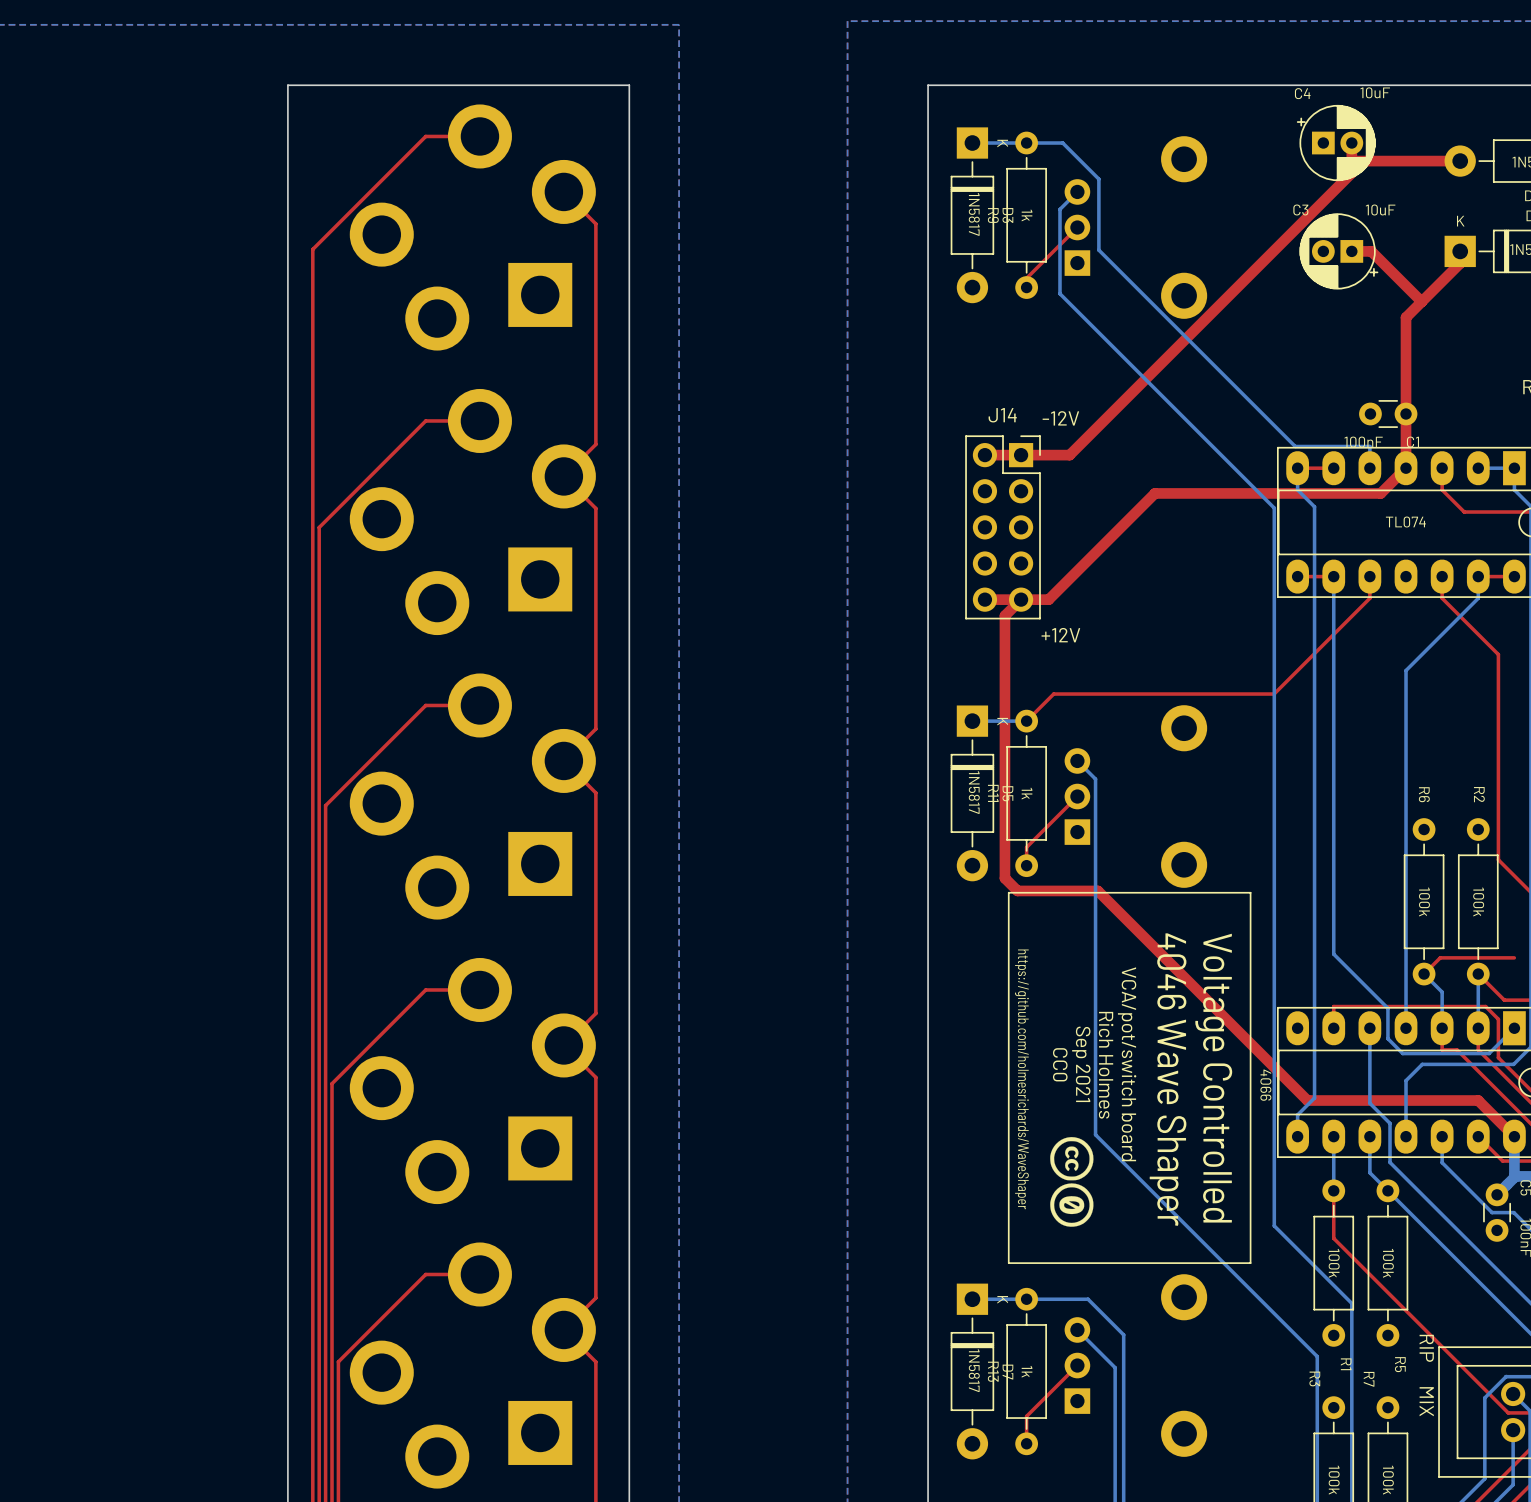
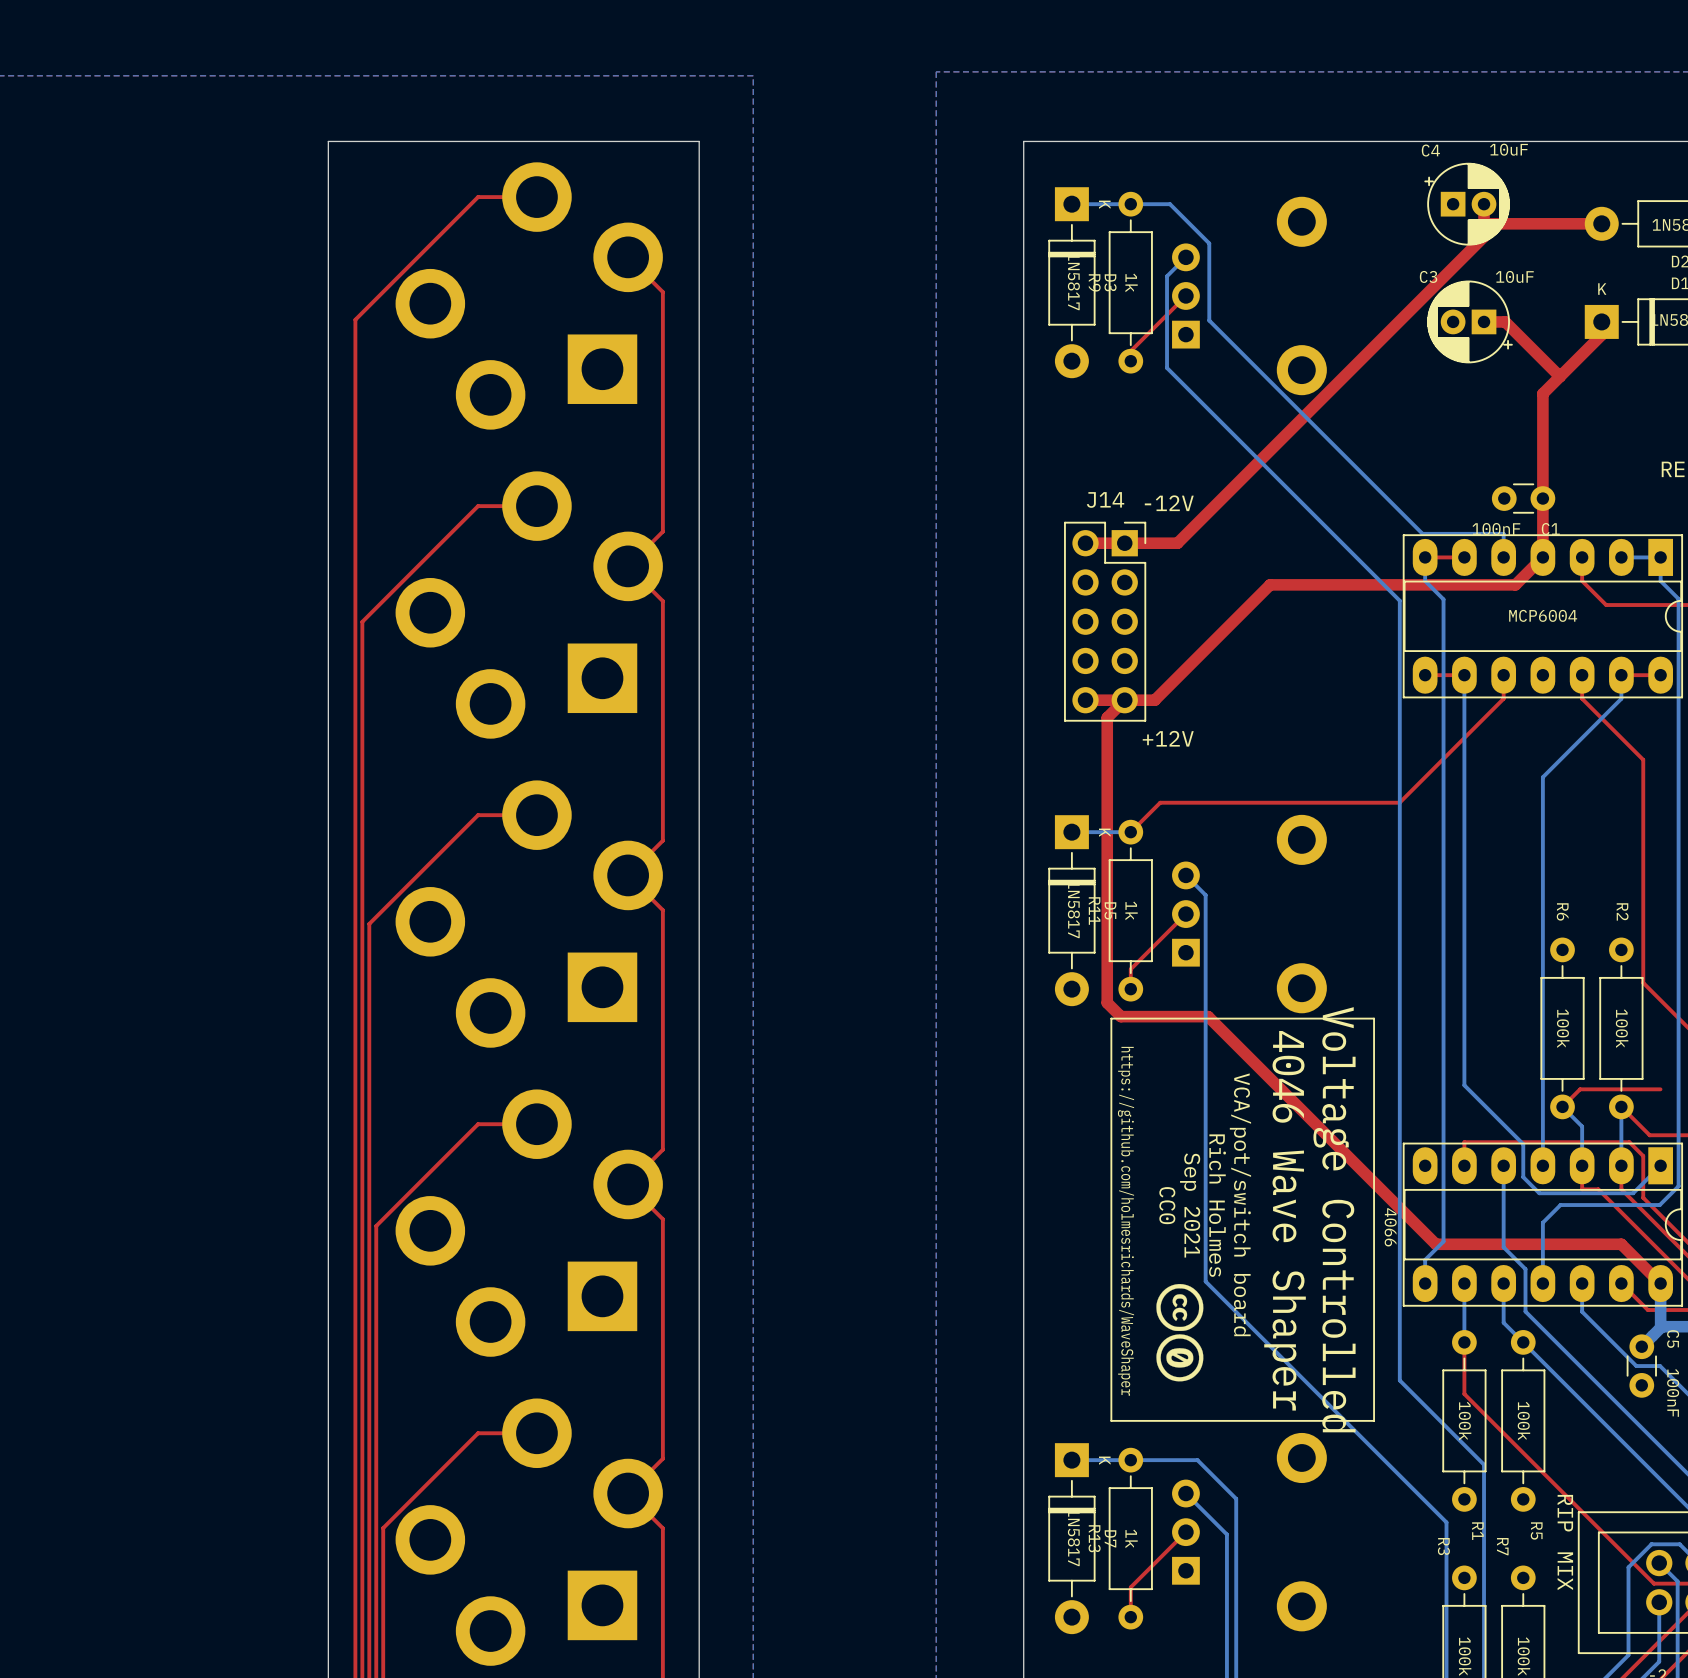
part value: TL074 (1405, 522) -> MCP6004 (1543, 615)

